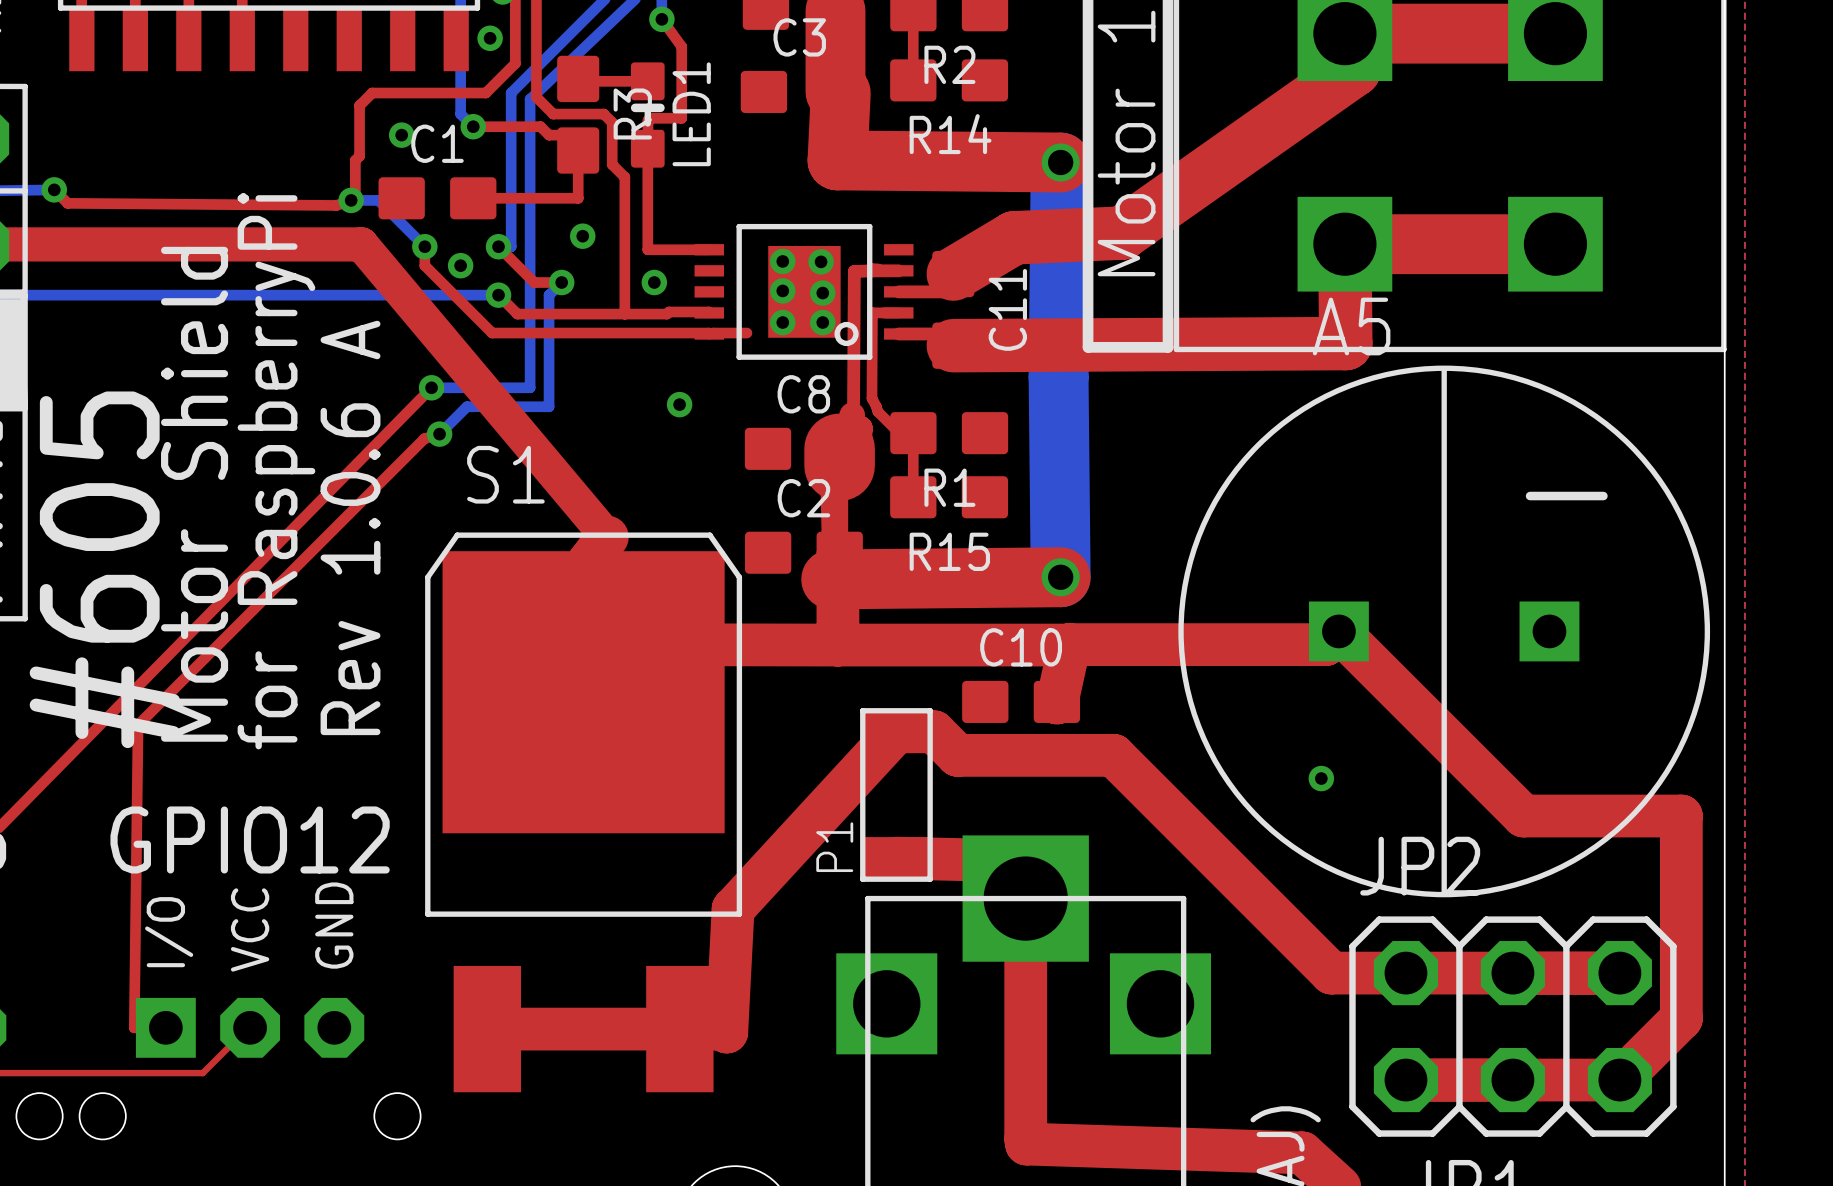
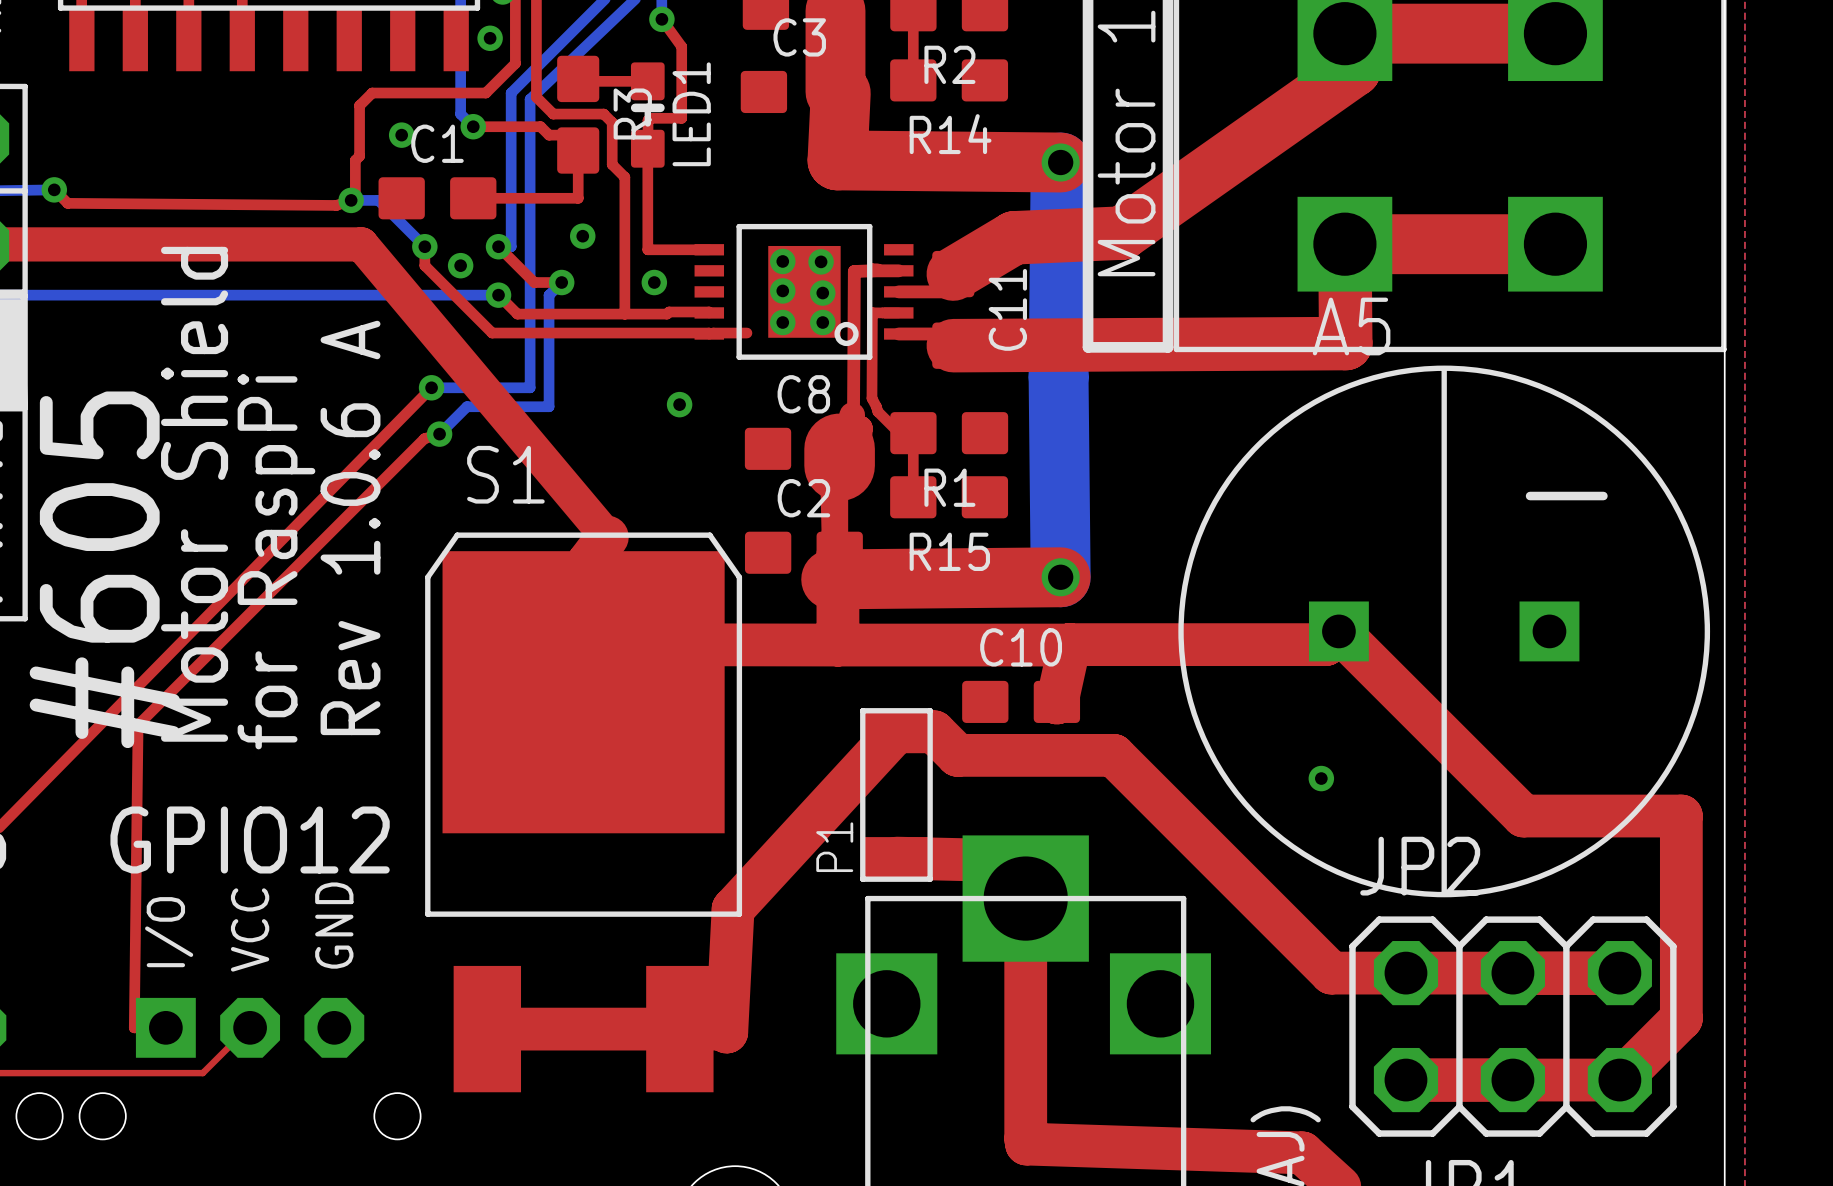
text: for RaspberryPi (276, 471) -> for RaspPi (276, 561)

